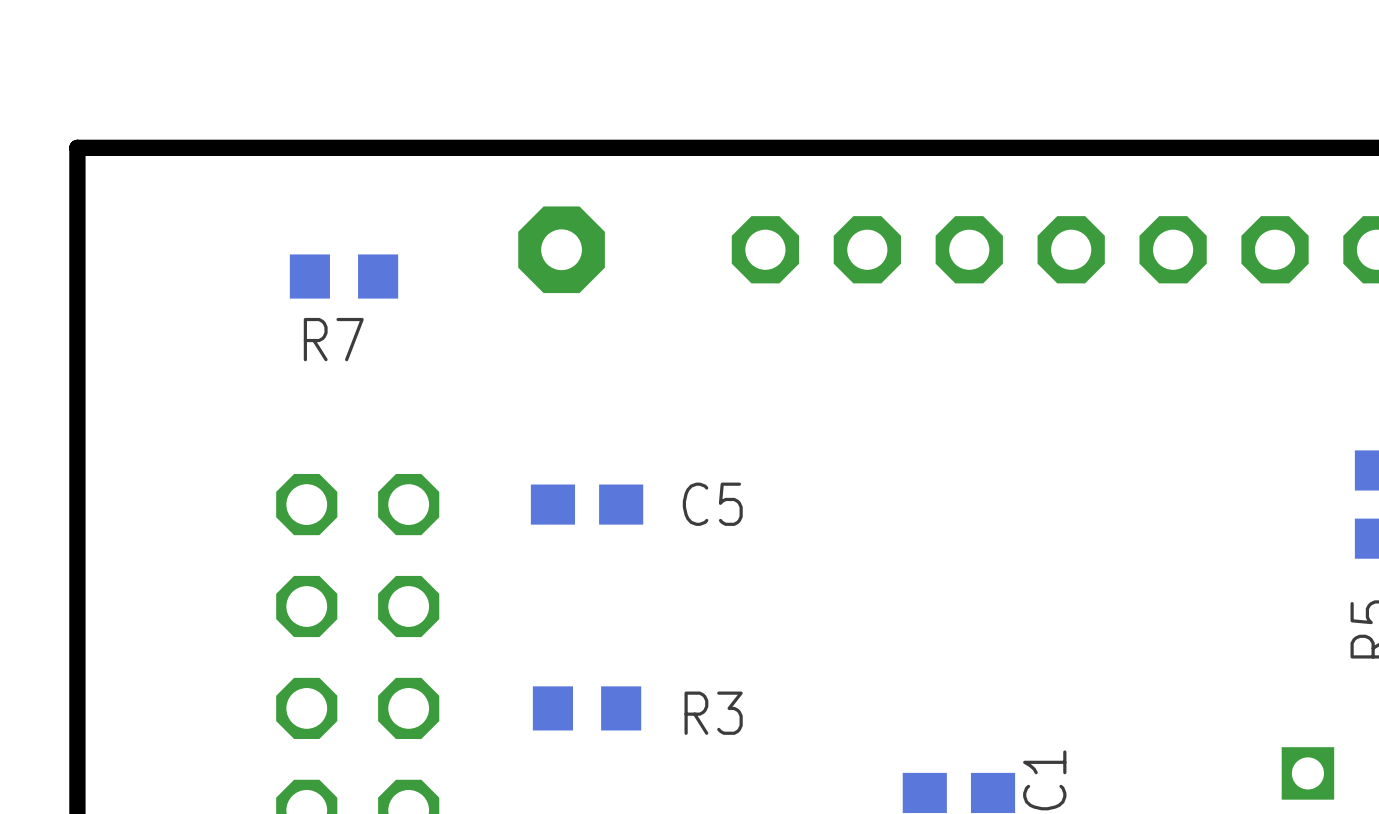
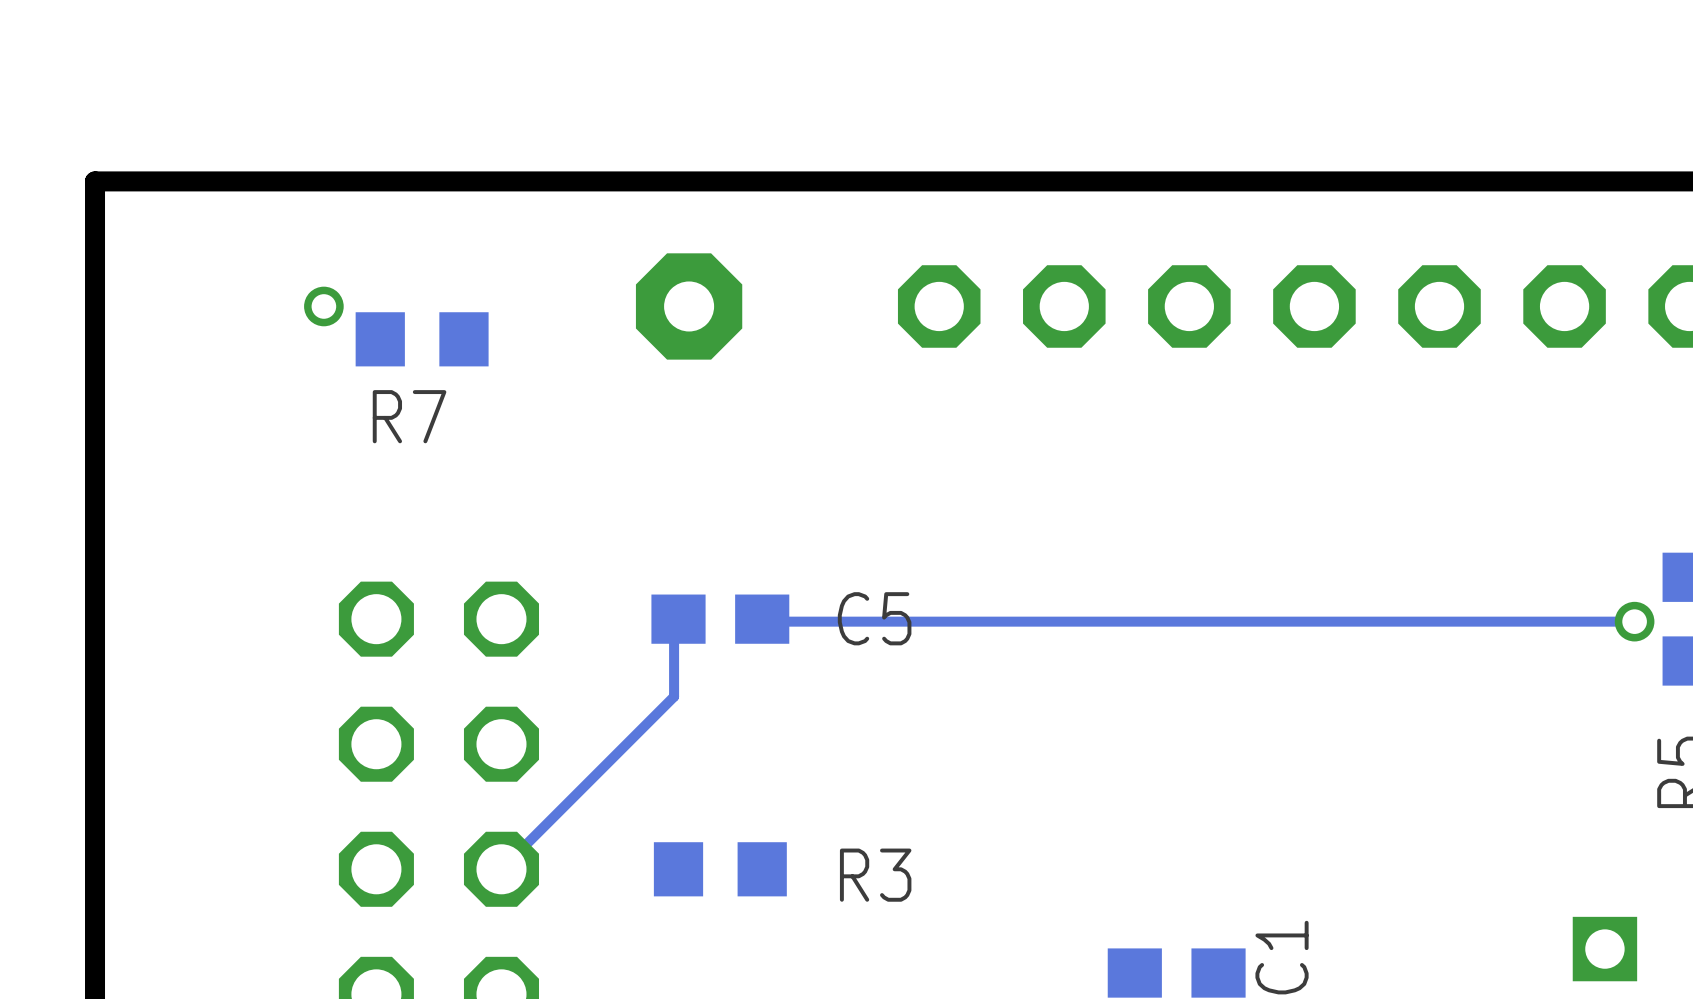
via: none -> (323, 306)
track: none -> (678, 619) (674, 621) (674, 696) (501, 869)
track: none -> (762, 619) (764, 621) (1634, 621)
via: none -> (1634, 621)

